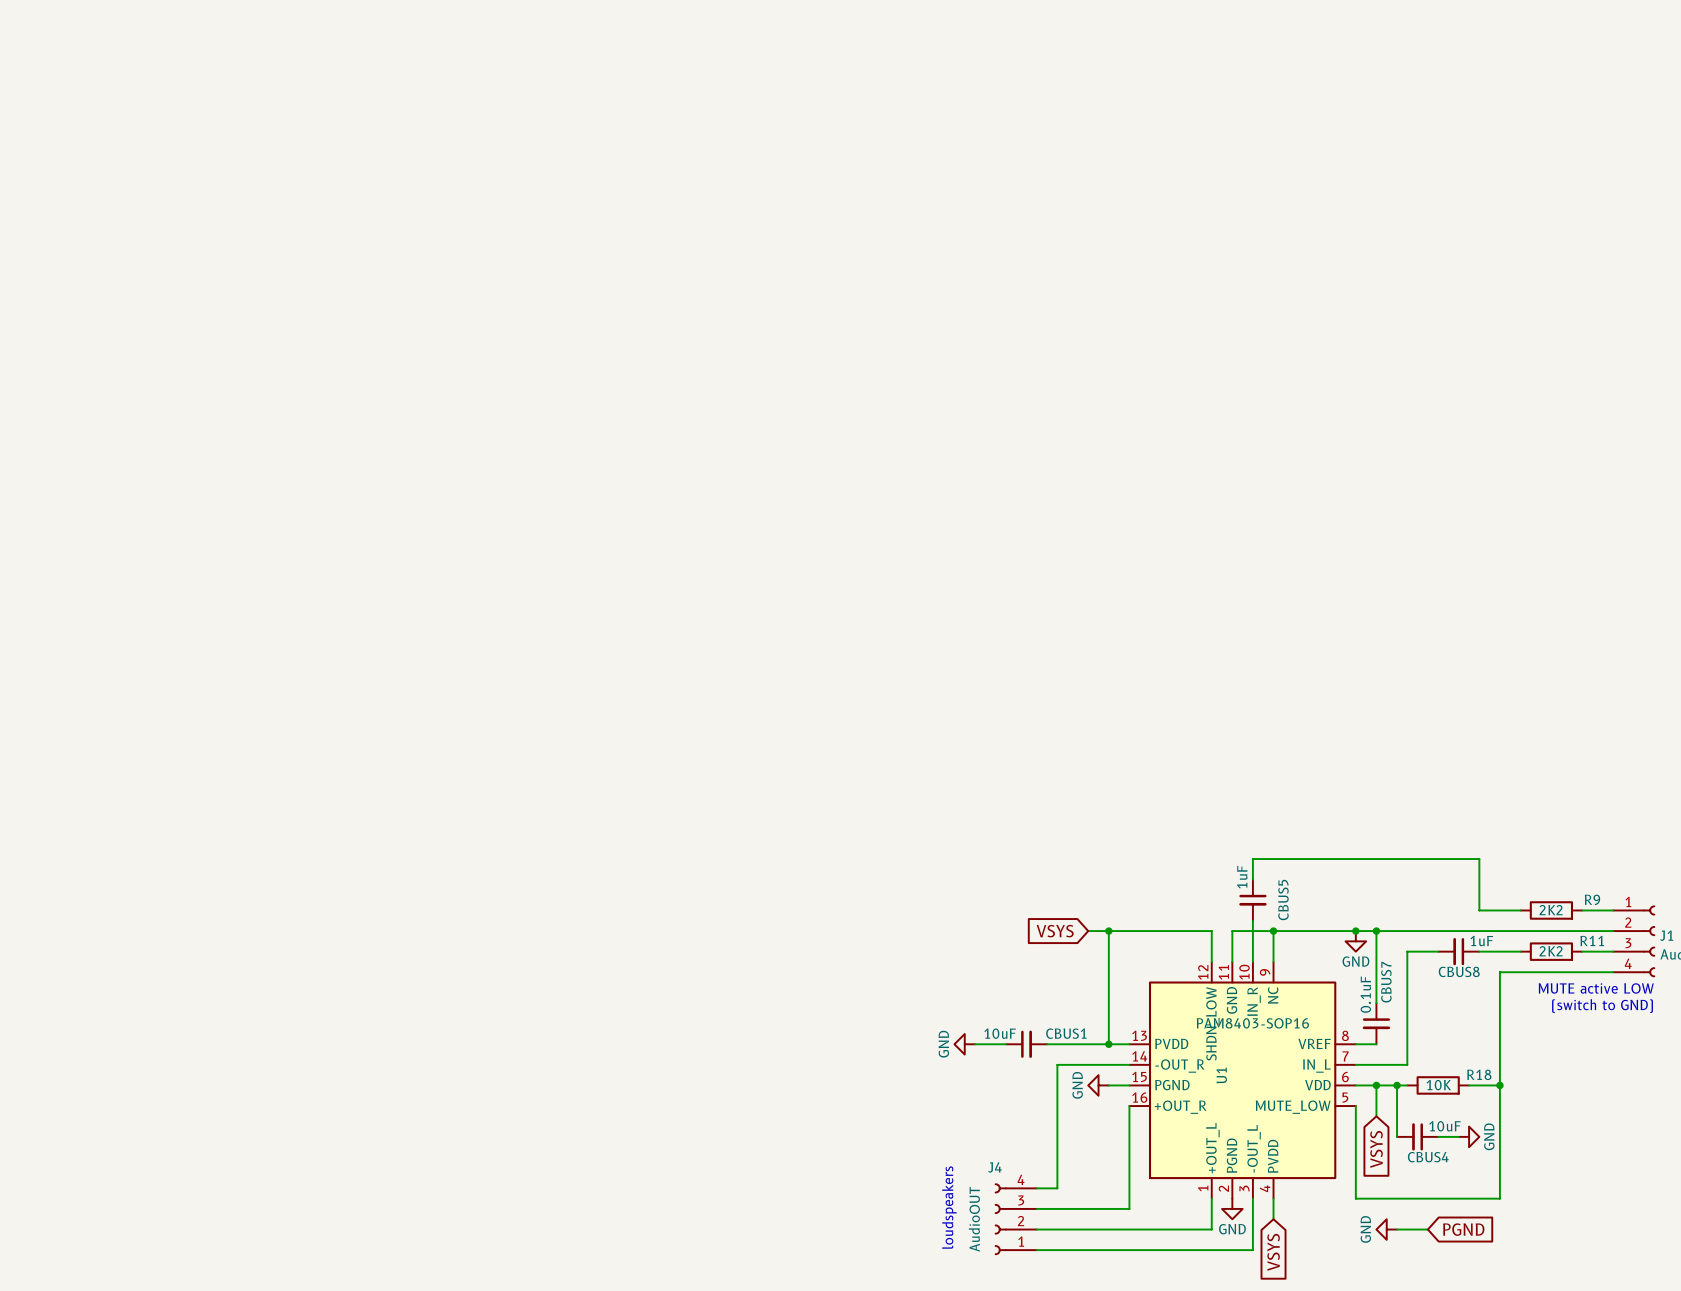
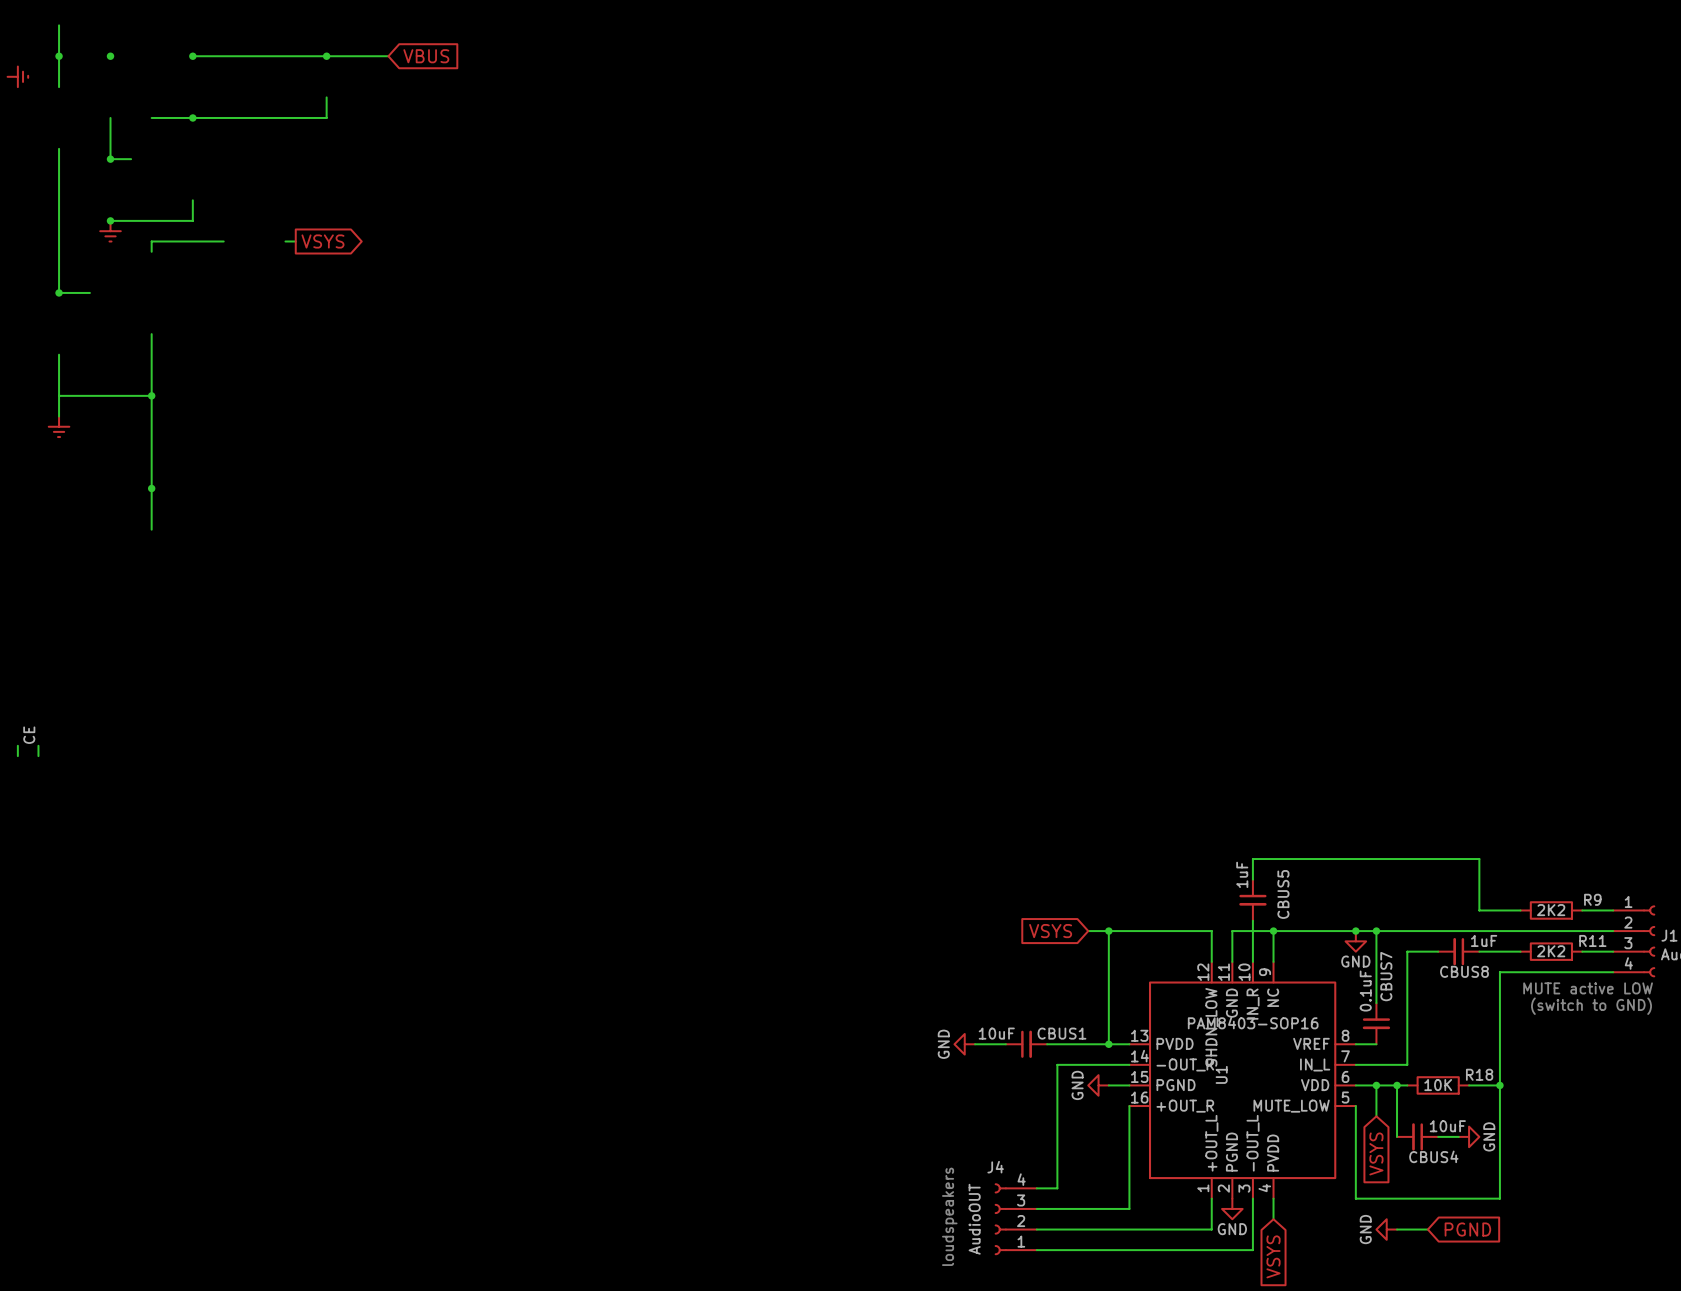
wire: none -> (59, 25) (59, 87)
junction: none -> (59, 56)
junction: none -> (110, 56)
wire: none -> (192, 56) (388, 56)
junction: none -> (192, 56)
junction: none -> (326, 56)
global label: none -> VBUS (426, 56)
power symbol: none -> (17, 76)
wire: none -> (326, 97) (326, 117) (151, 117)
wire: none -> (110, 117) (110, 159) (131, 159)
junction: none -> (192, 117)
wire: none -> (59, 148) (59, 292) (89, 292)
junction: none -> (110, 159)
wire: none -> (192, 200) (192, 220) (110, 220)
junction: none -> (110, 220)
power symbol: none -> (110, 231)
wire: none -> (223, 241) (151, 241) (151, 251)
wire: none -> (285, 241) (295, 241)
global label: none -> VSYS (322, 241)
junction: none -> (59, 292)
wire: none -> (151, 334) (151, 529)
wire: none -> (59, 354) (59, 416)
wire: none -> (59, 395) (151, 395)
junction: none -> (151, 395)
power symbol: none -> (59, 426)
junction: none -> (151, 488)
label: none -> CE (29, 735)
wire: none -> (17, 745) (17, 756)
wire: none -> (38, 745) (38, 756)

